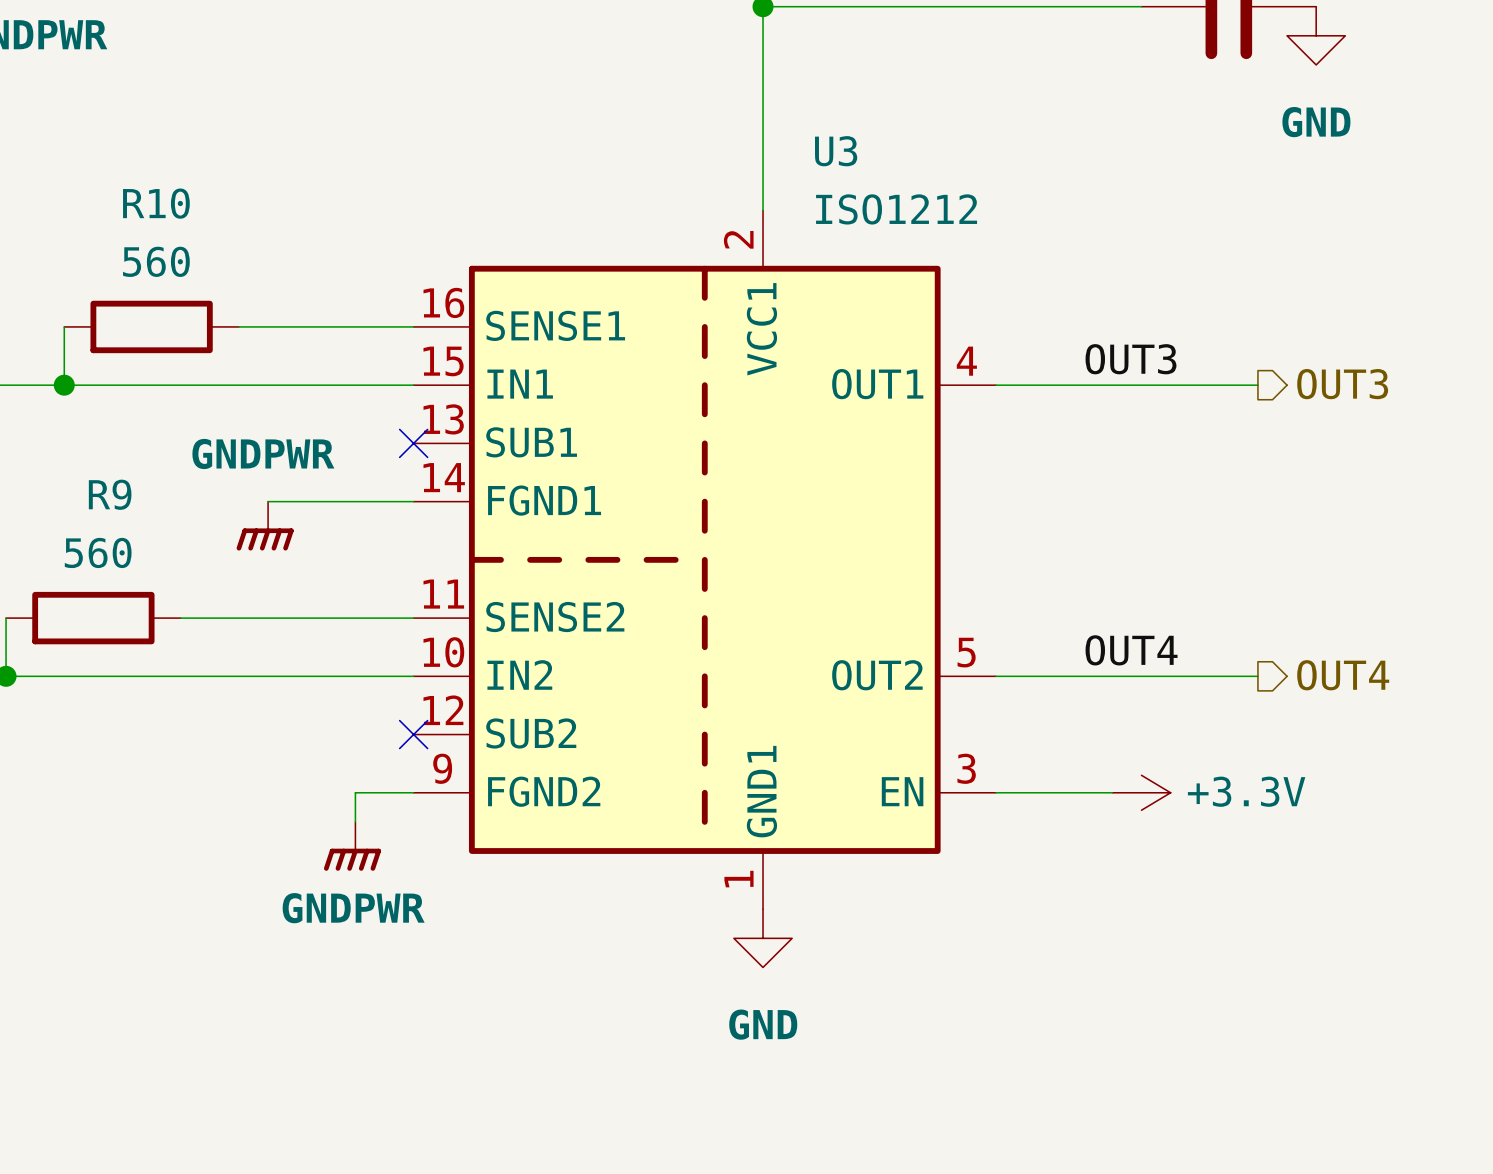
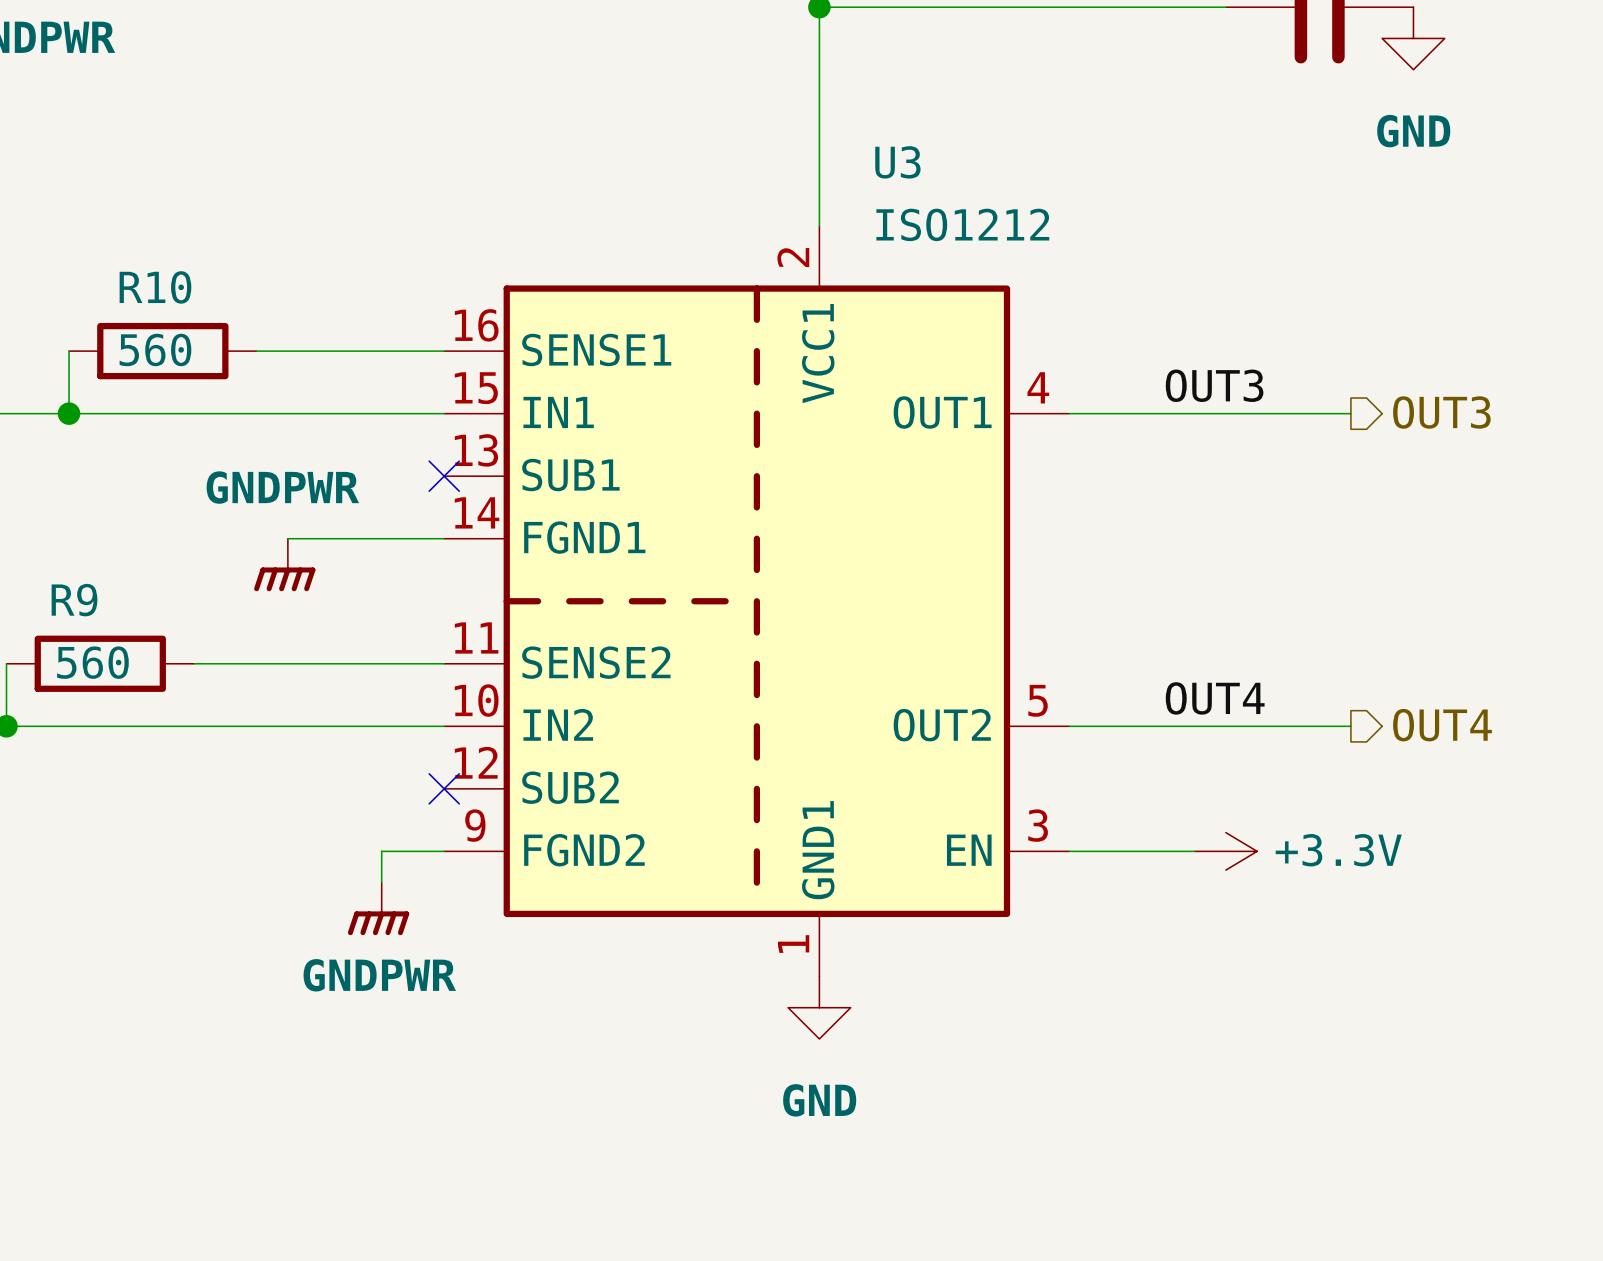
R10 name position: R10 (156, 203) -> R10 (155, 287)
R10 value position: 560 (156, 261) -> 560 (155, 349)
R9 name position: R9 (110, 494) -> R9 (74, 600)
R9 value position: 560 (98, 552) -> 560 (92, 662)

